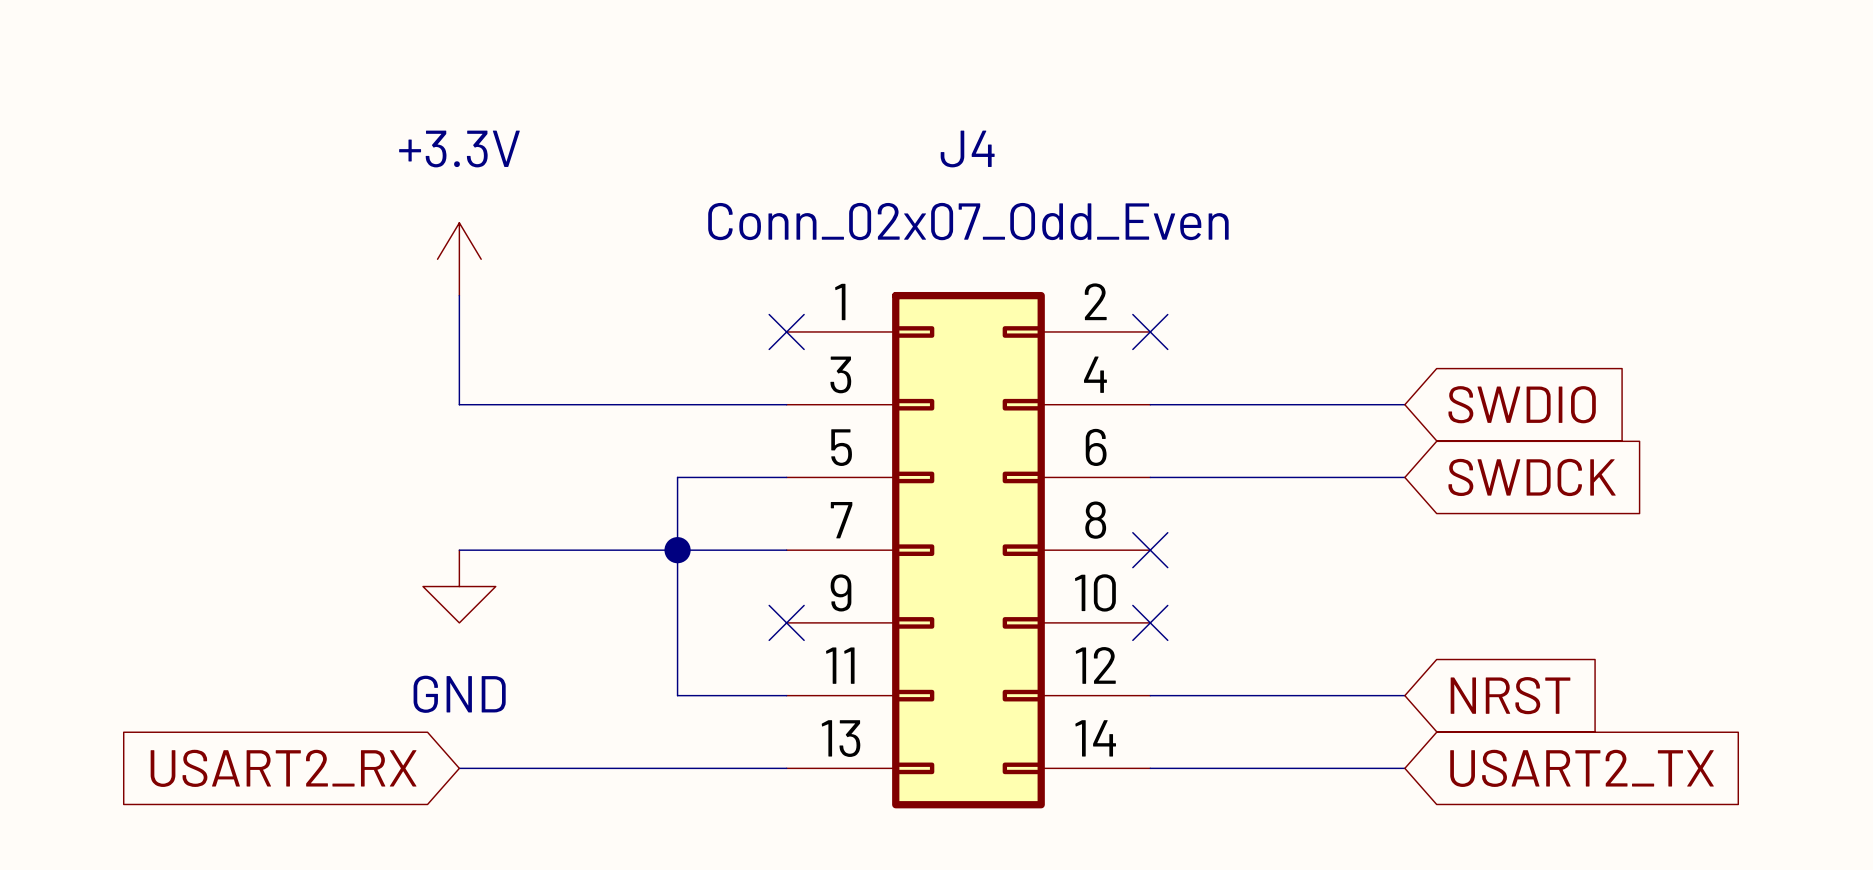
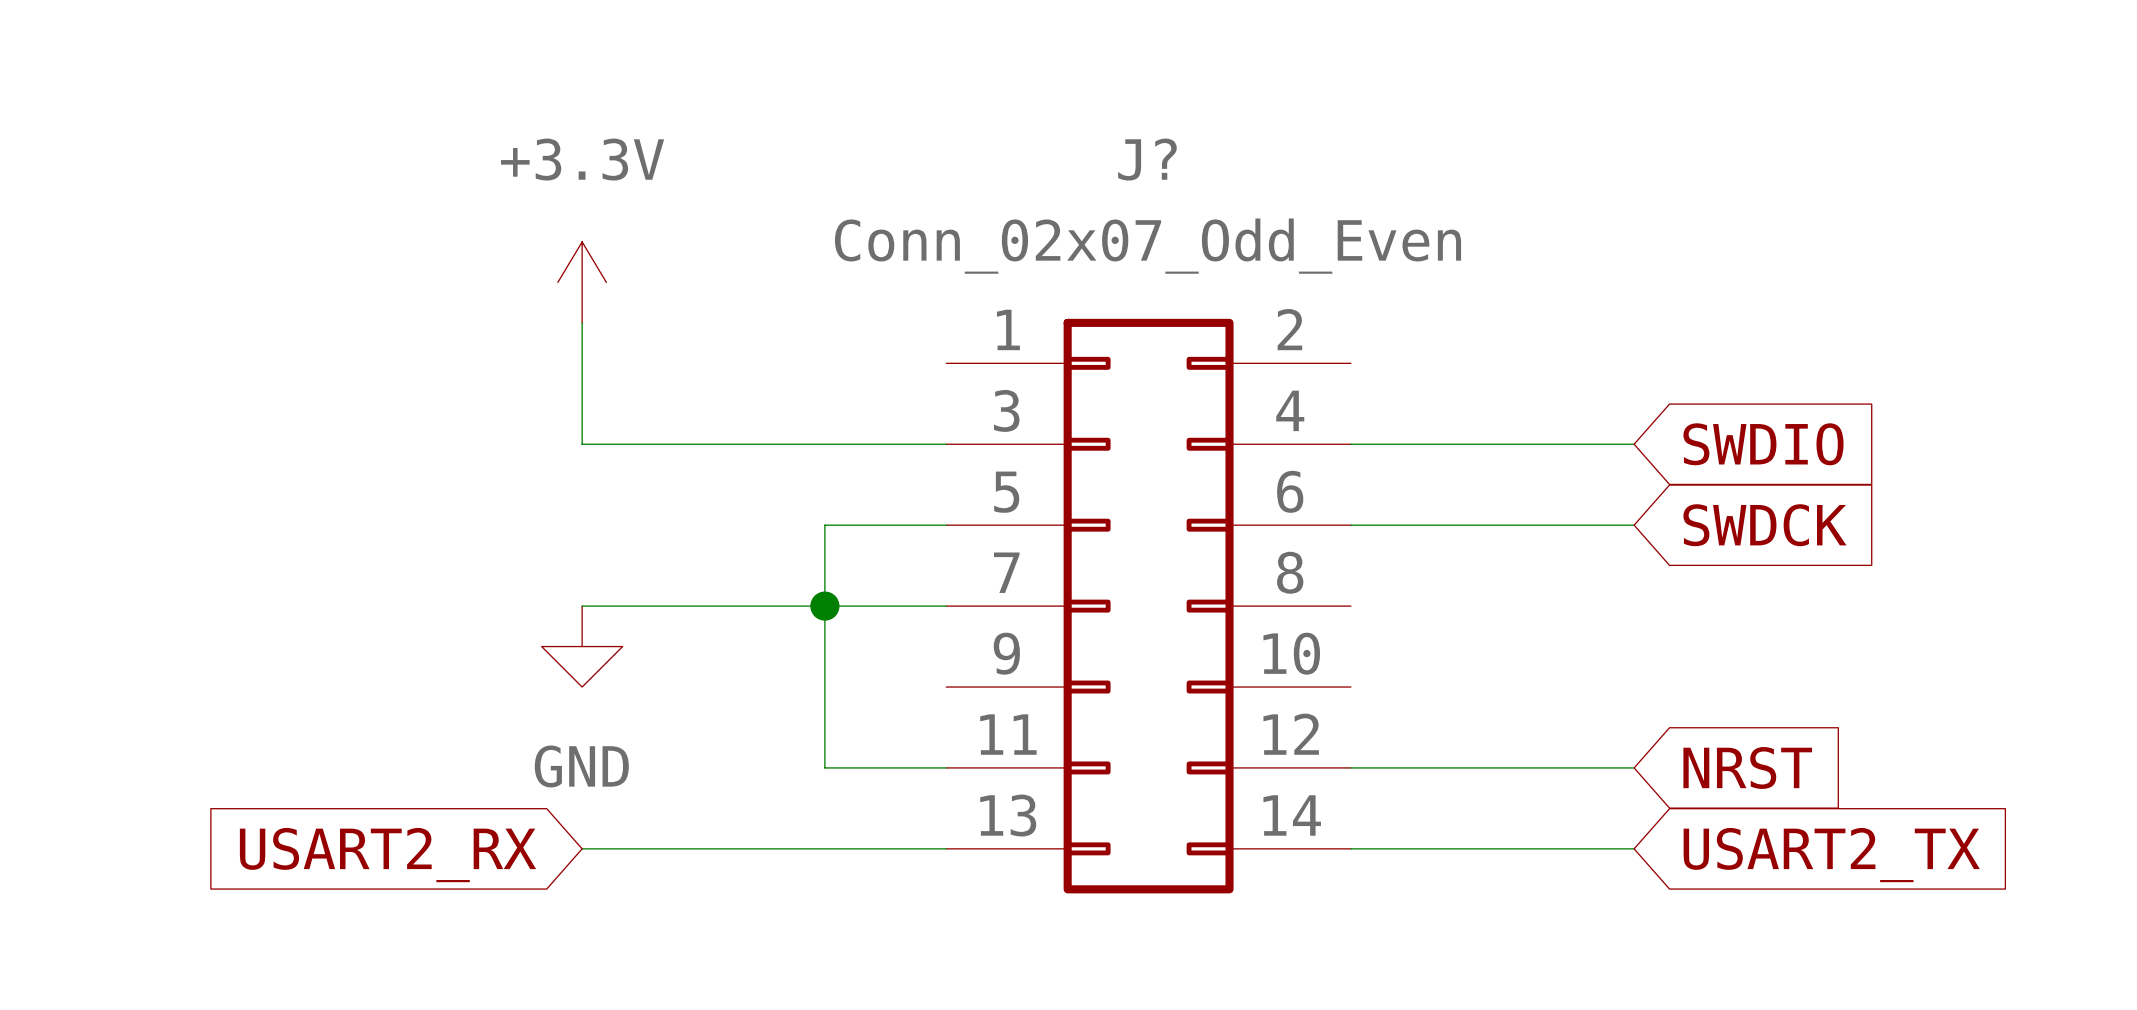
J4 name: J4 (967, 149) -> J? (1147, 159)
no-connect mark: (786, 331) -> none
no-connect mark: (1150, 331) -> none
no-connect mark: (1150, 550) -> none
no-connect mark: (786, 622) -> none
no-connect mark: (1150, 622) -> none

